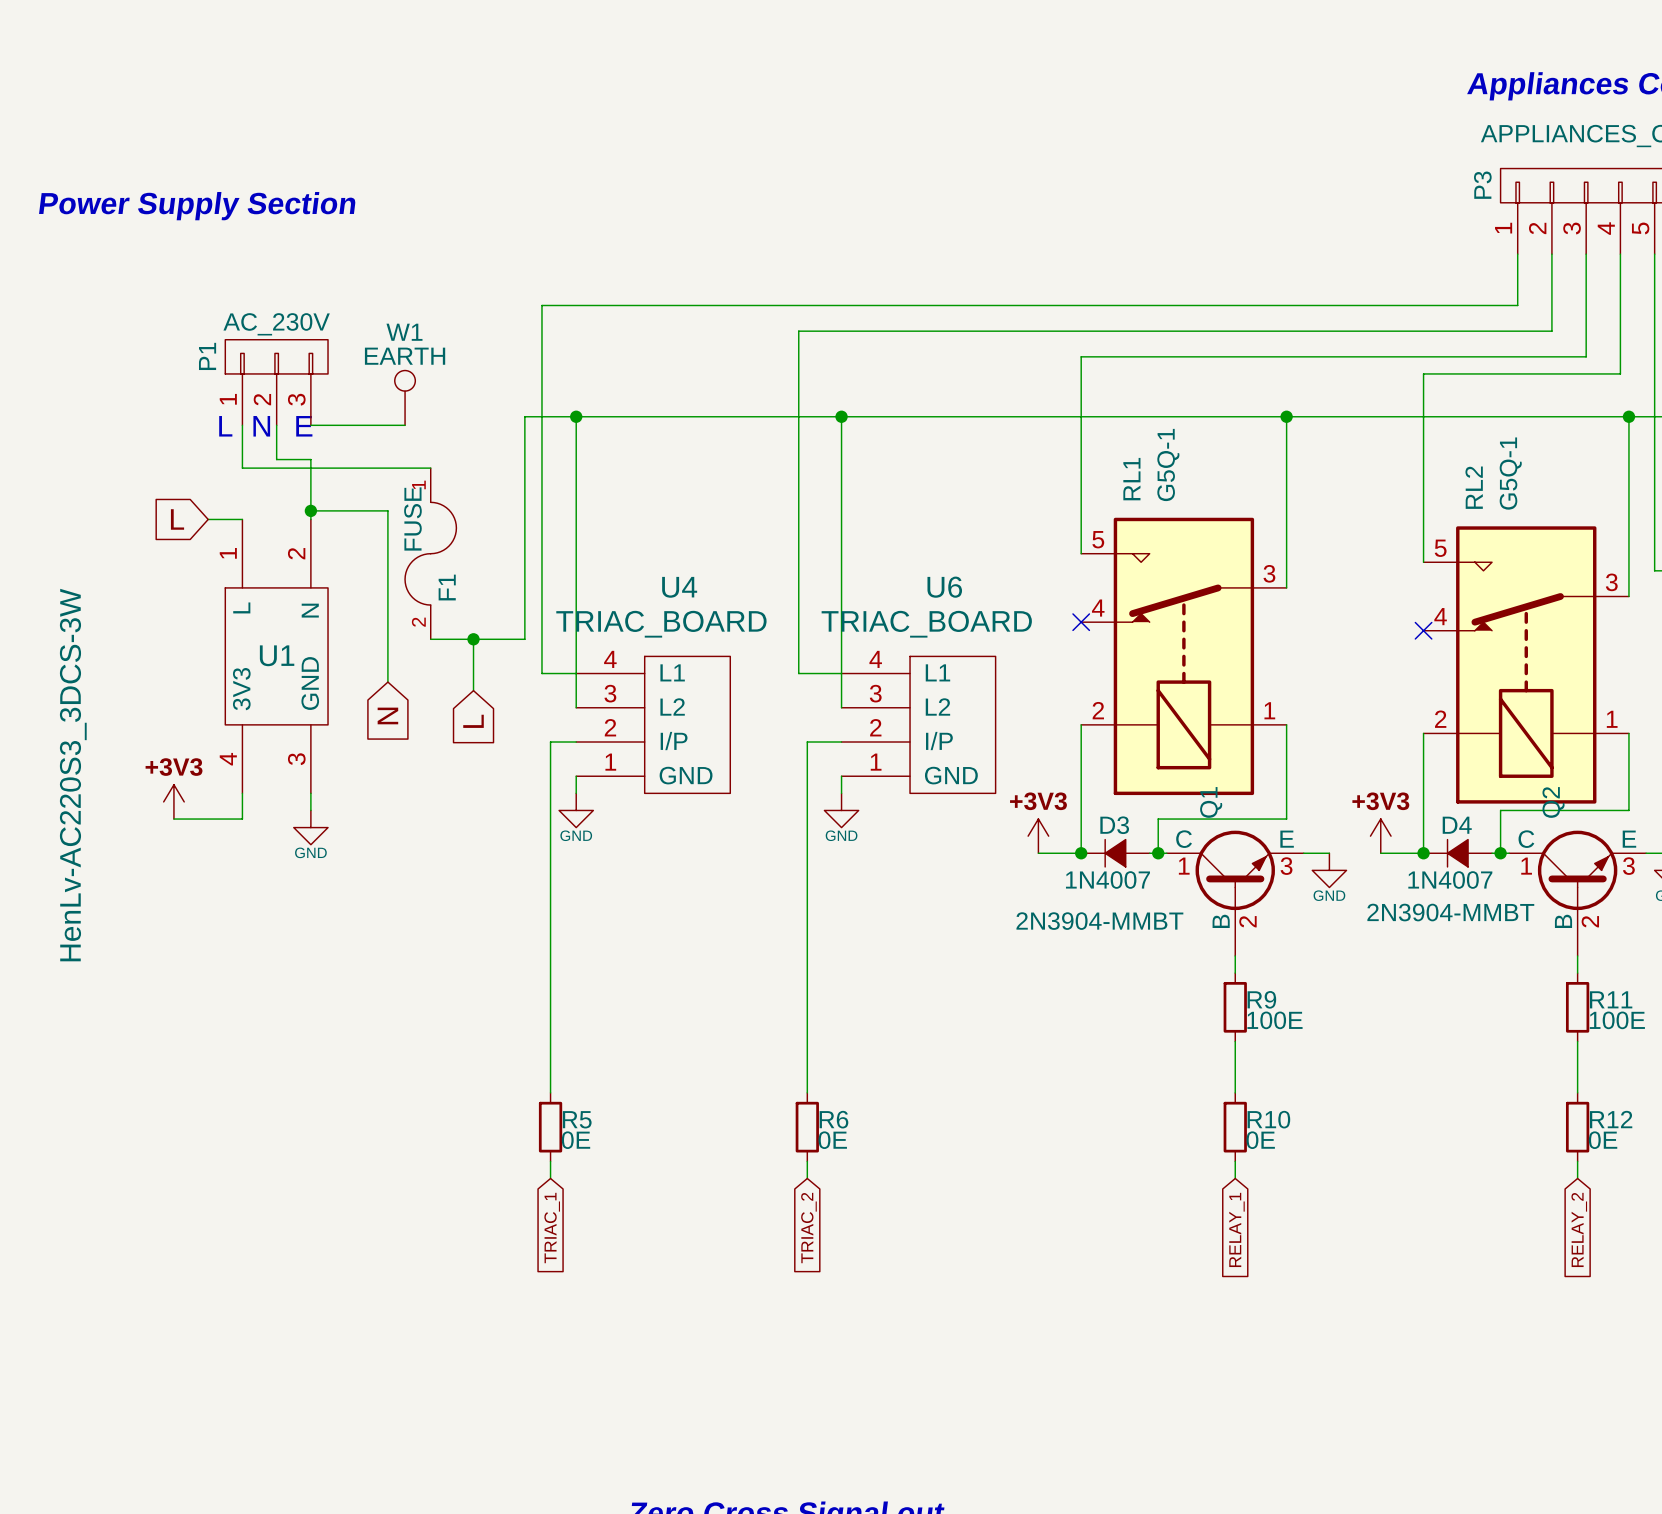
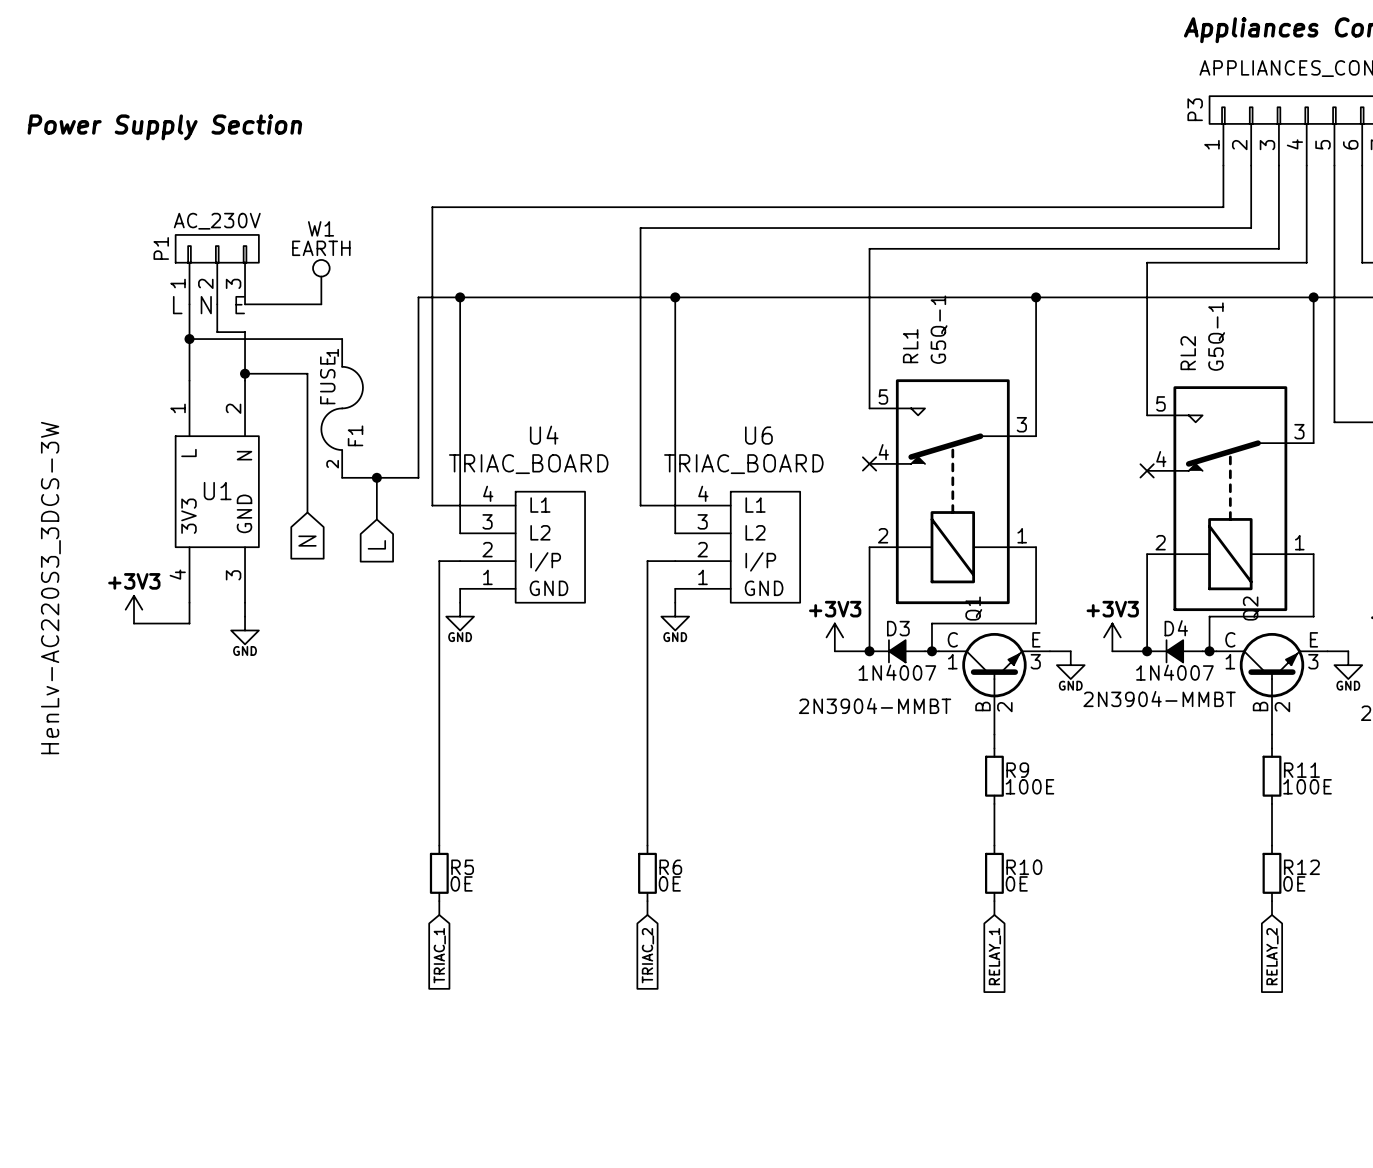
junction: none -> (189, 339)
global label: L (177, 519) -> none
wire: (208, 519) (242, 519) -> (189, 339) (189, 380)

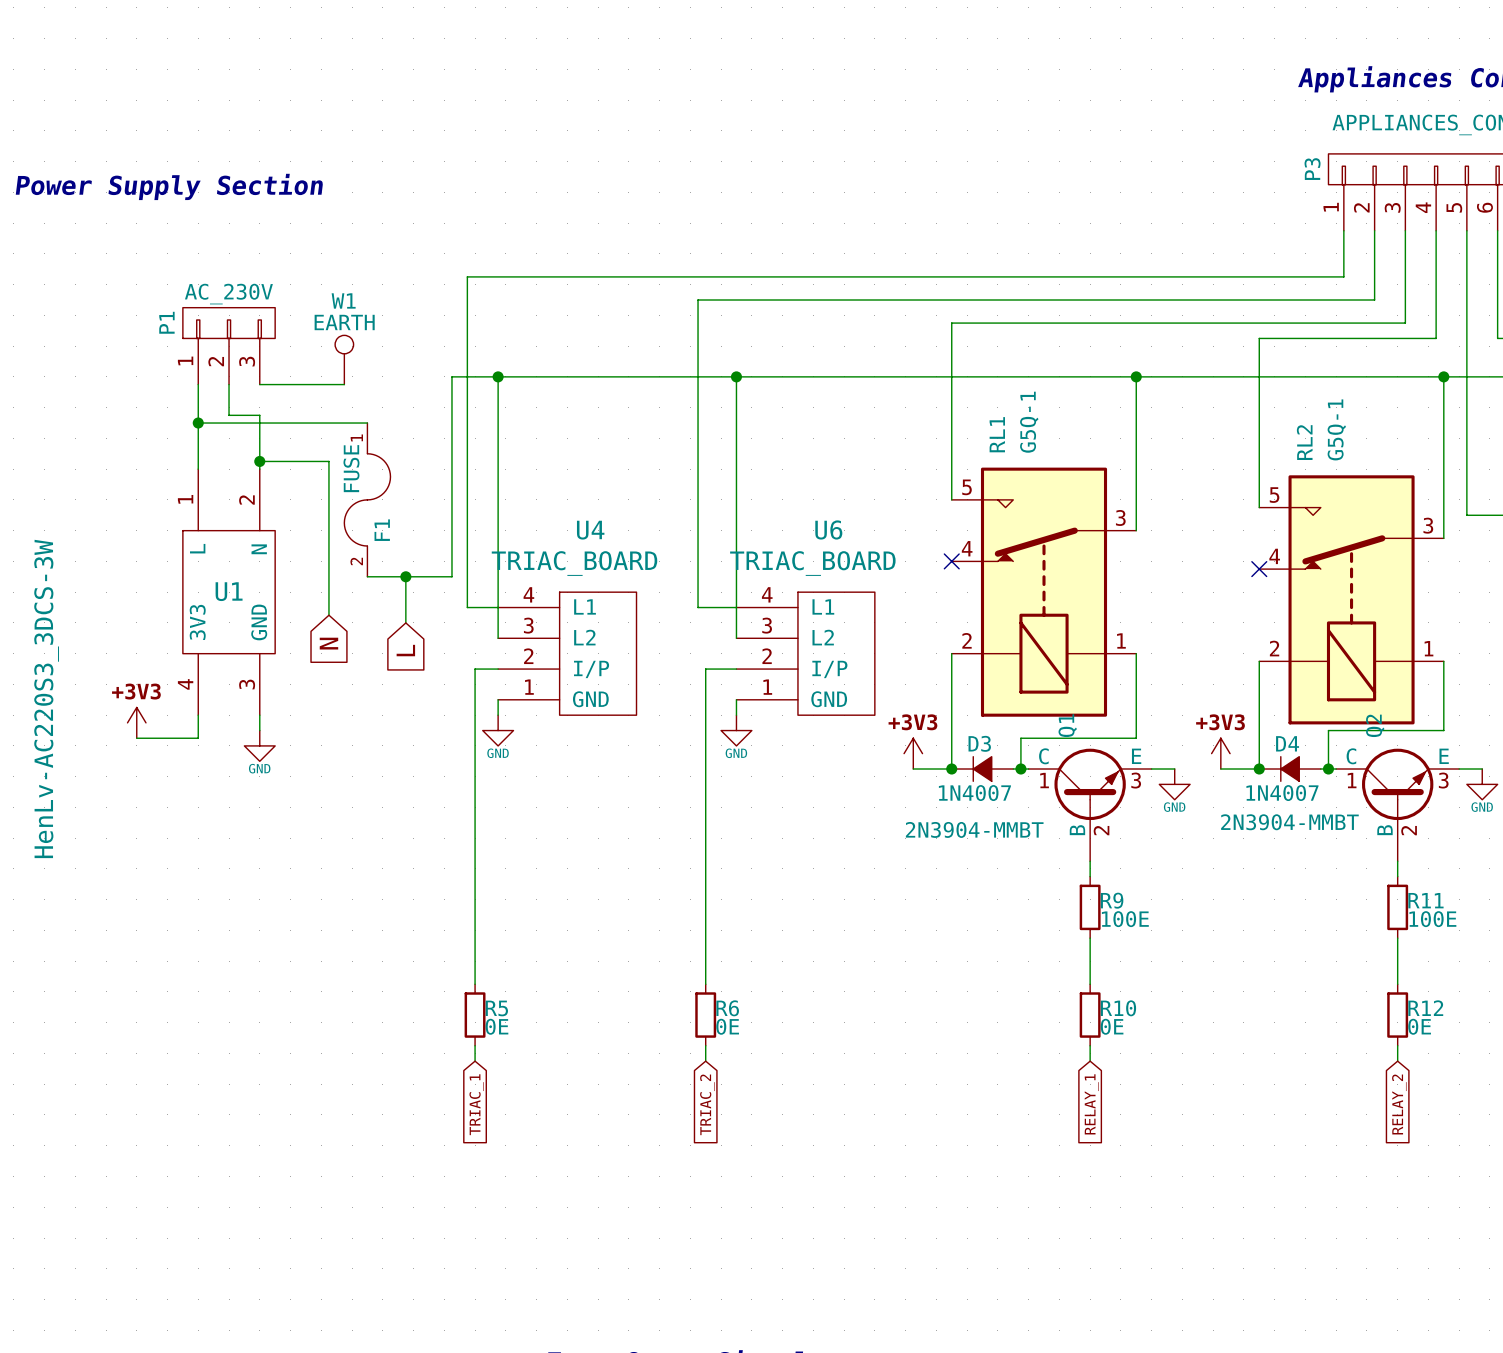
text: L (177, 305) -> none
text: N (206, 305) -> none
text: E (240, 305) -> none

